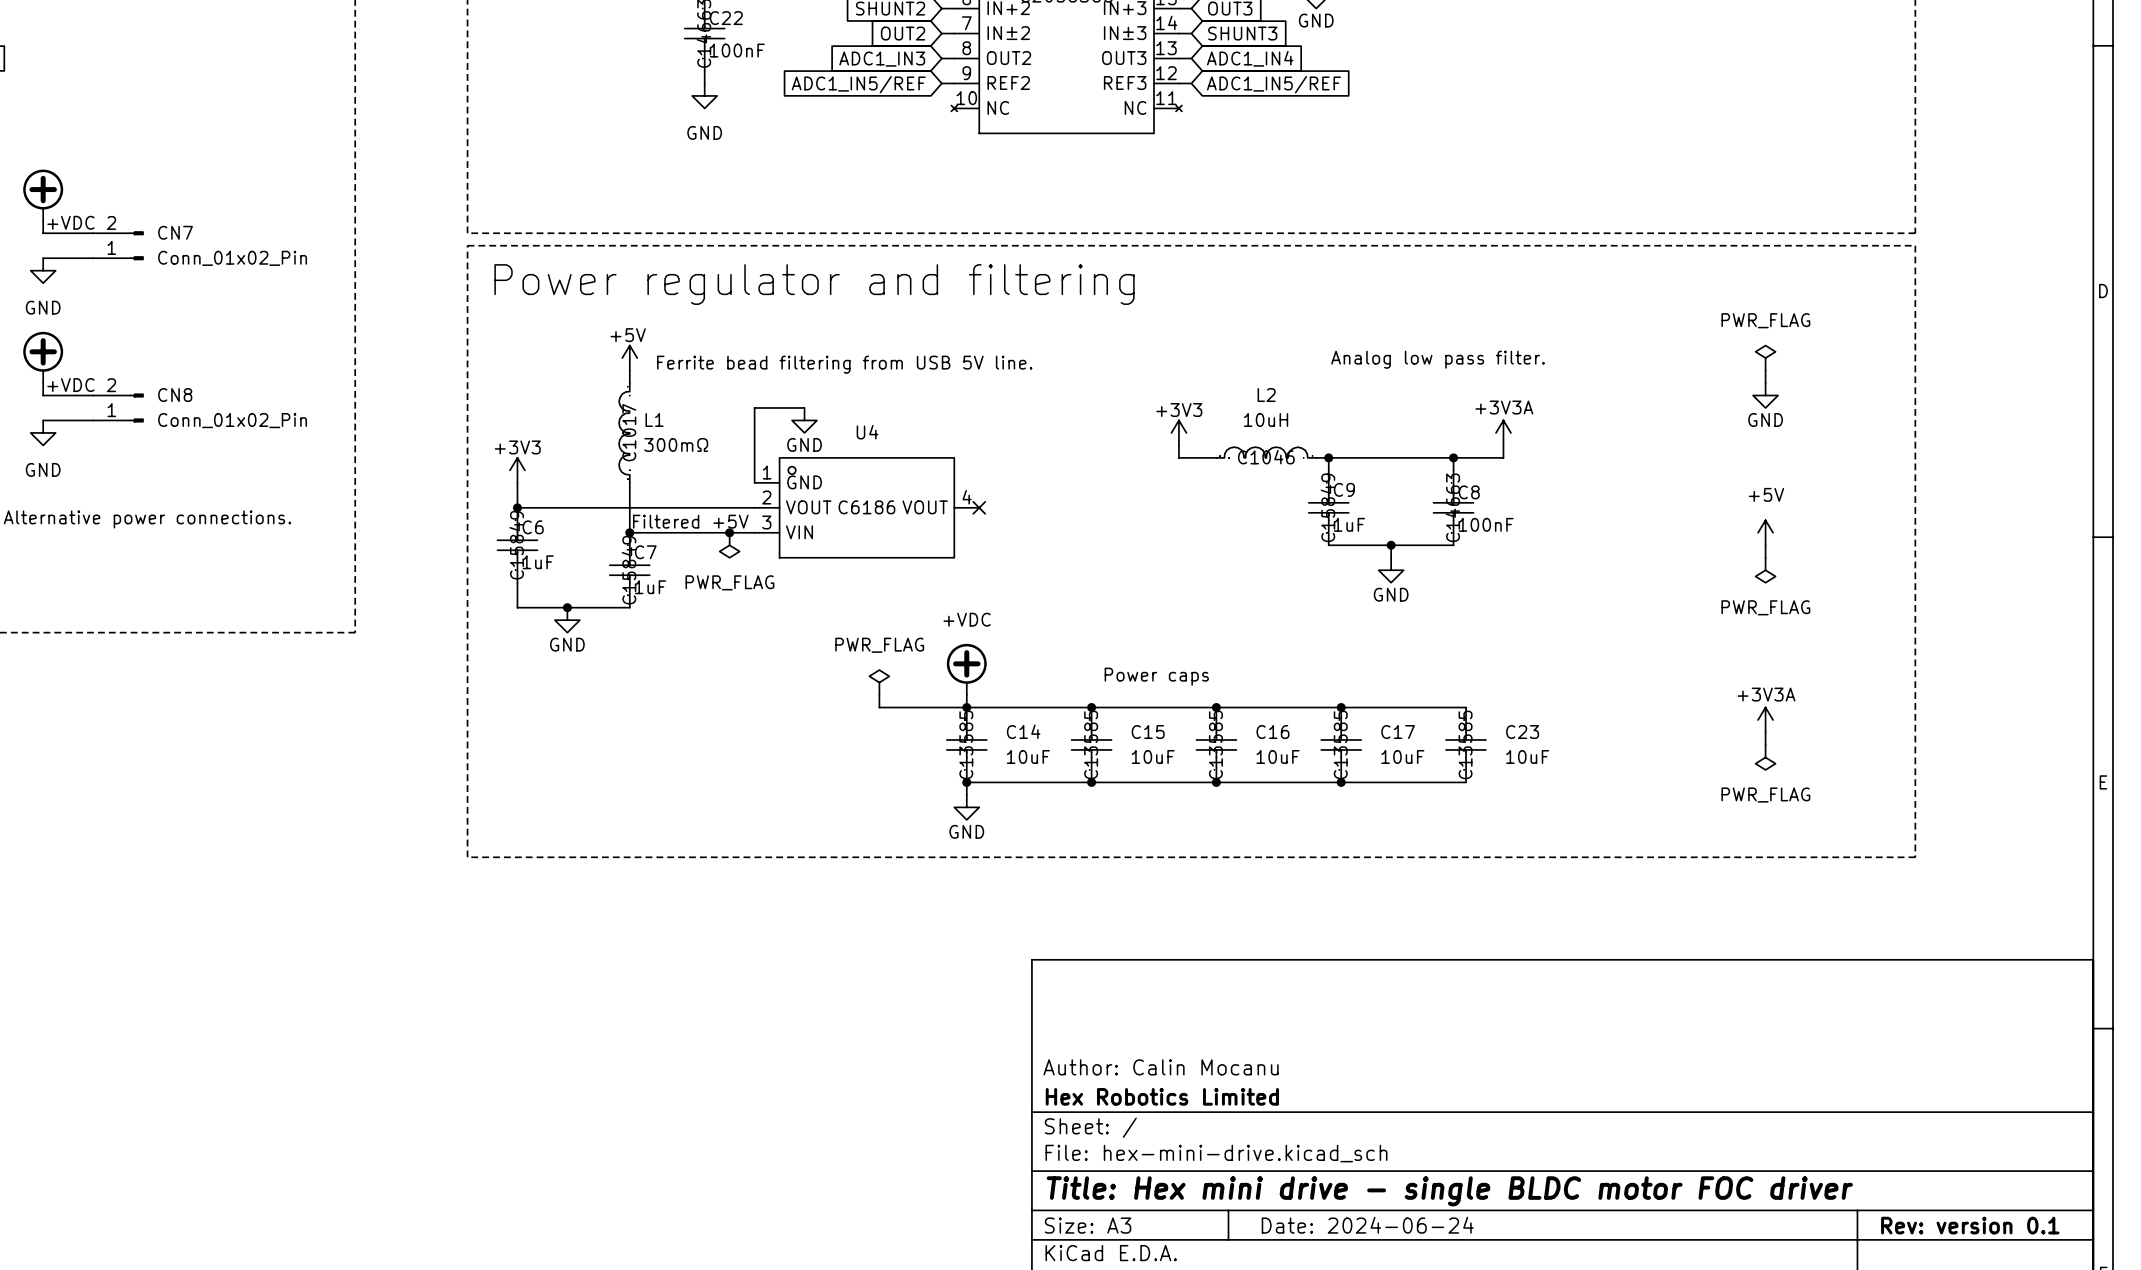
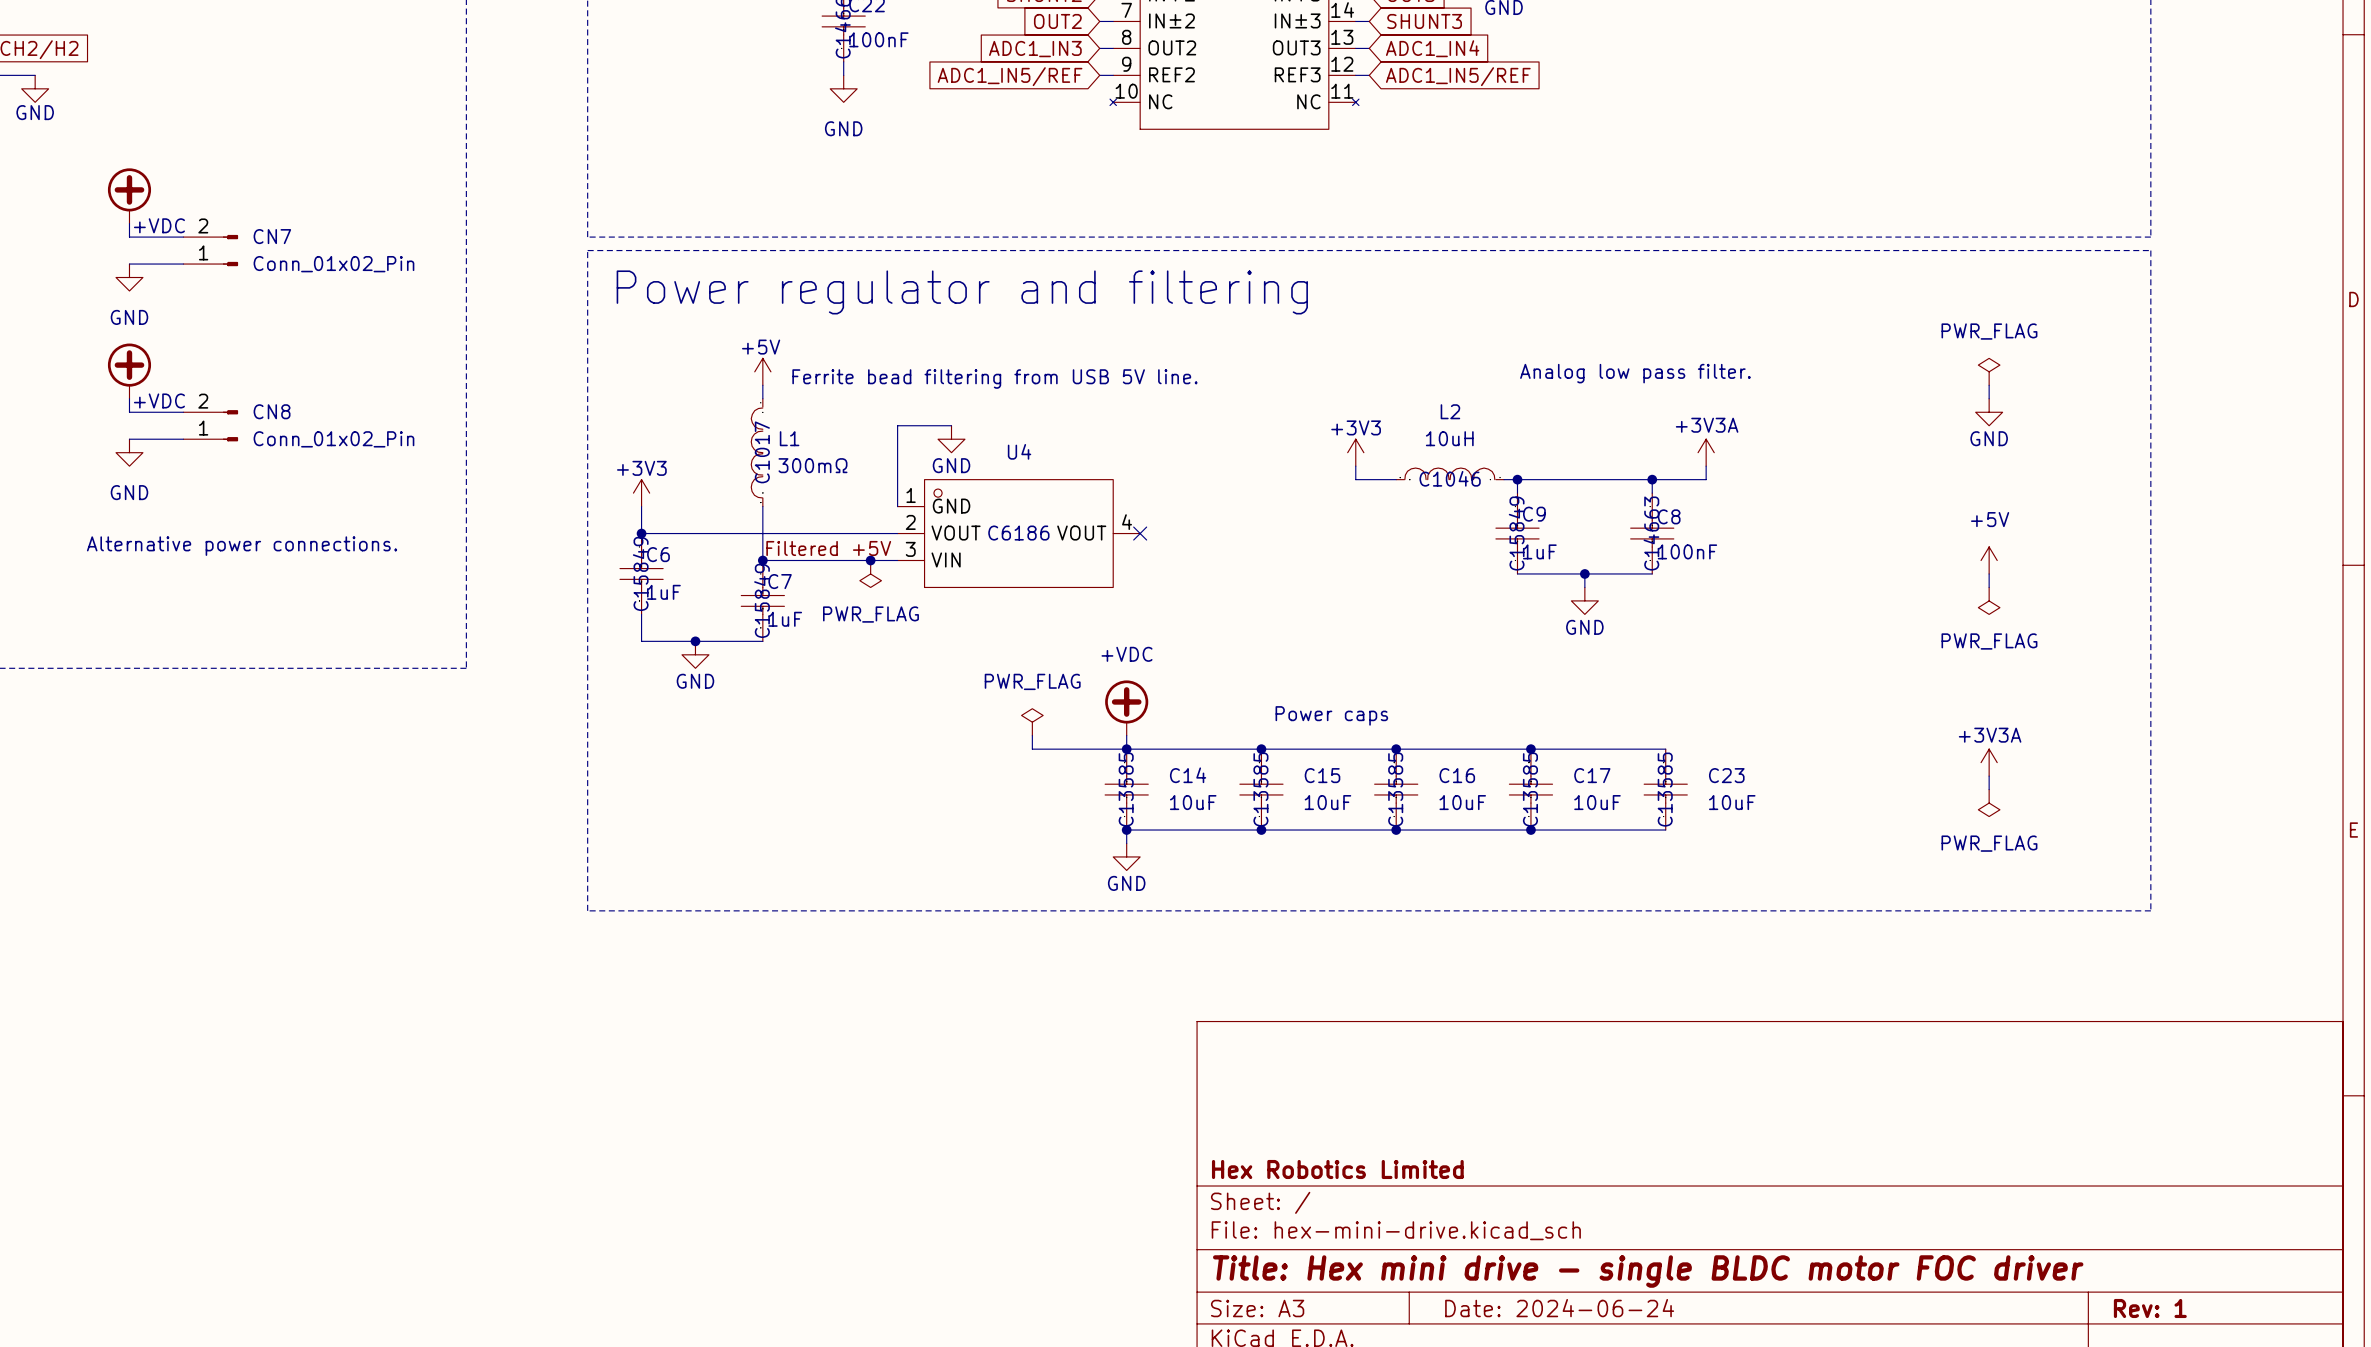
title block: Author: Calin Mocanu (1161, 1067) -> none
title block: Rev: version 0.1 (1970, 1225) -> Rev: 1 (2150, 1308)

